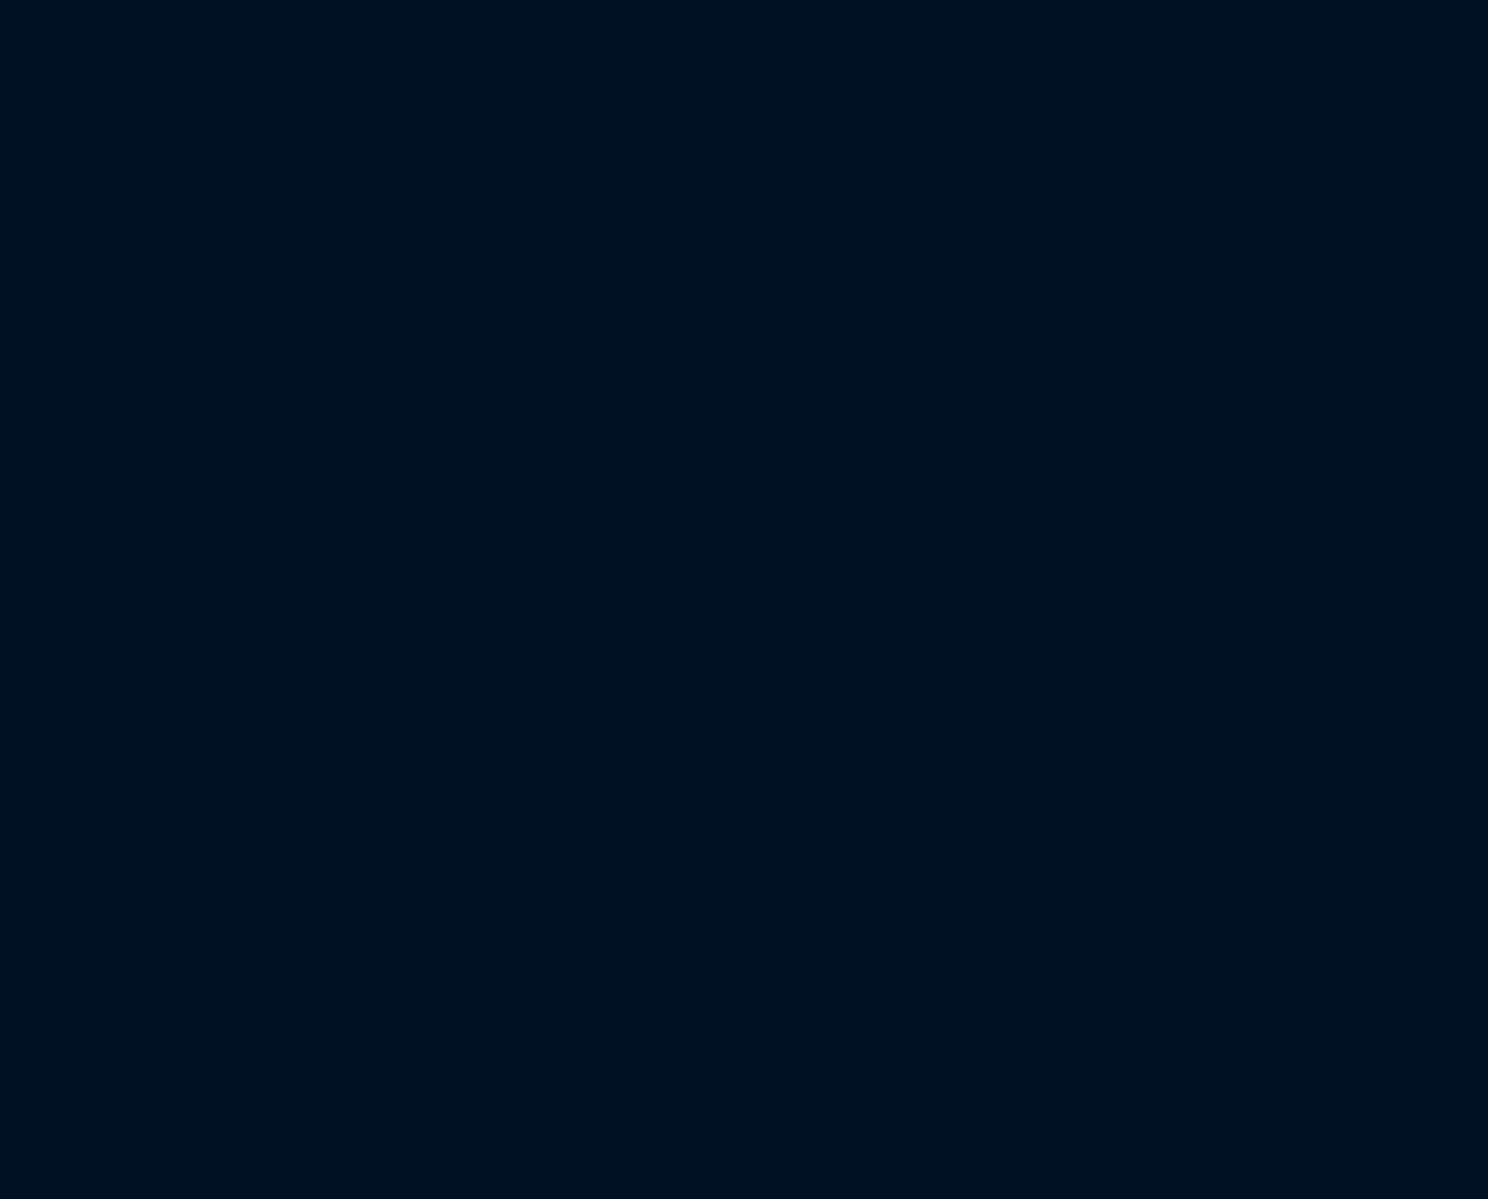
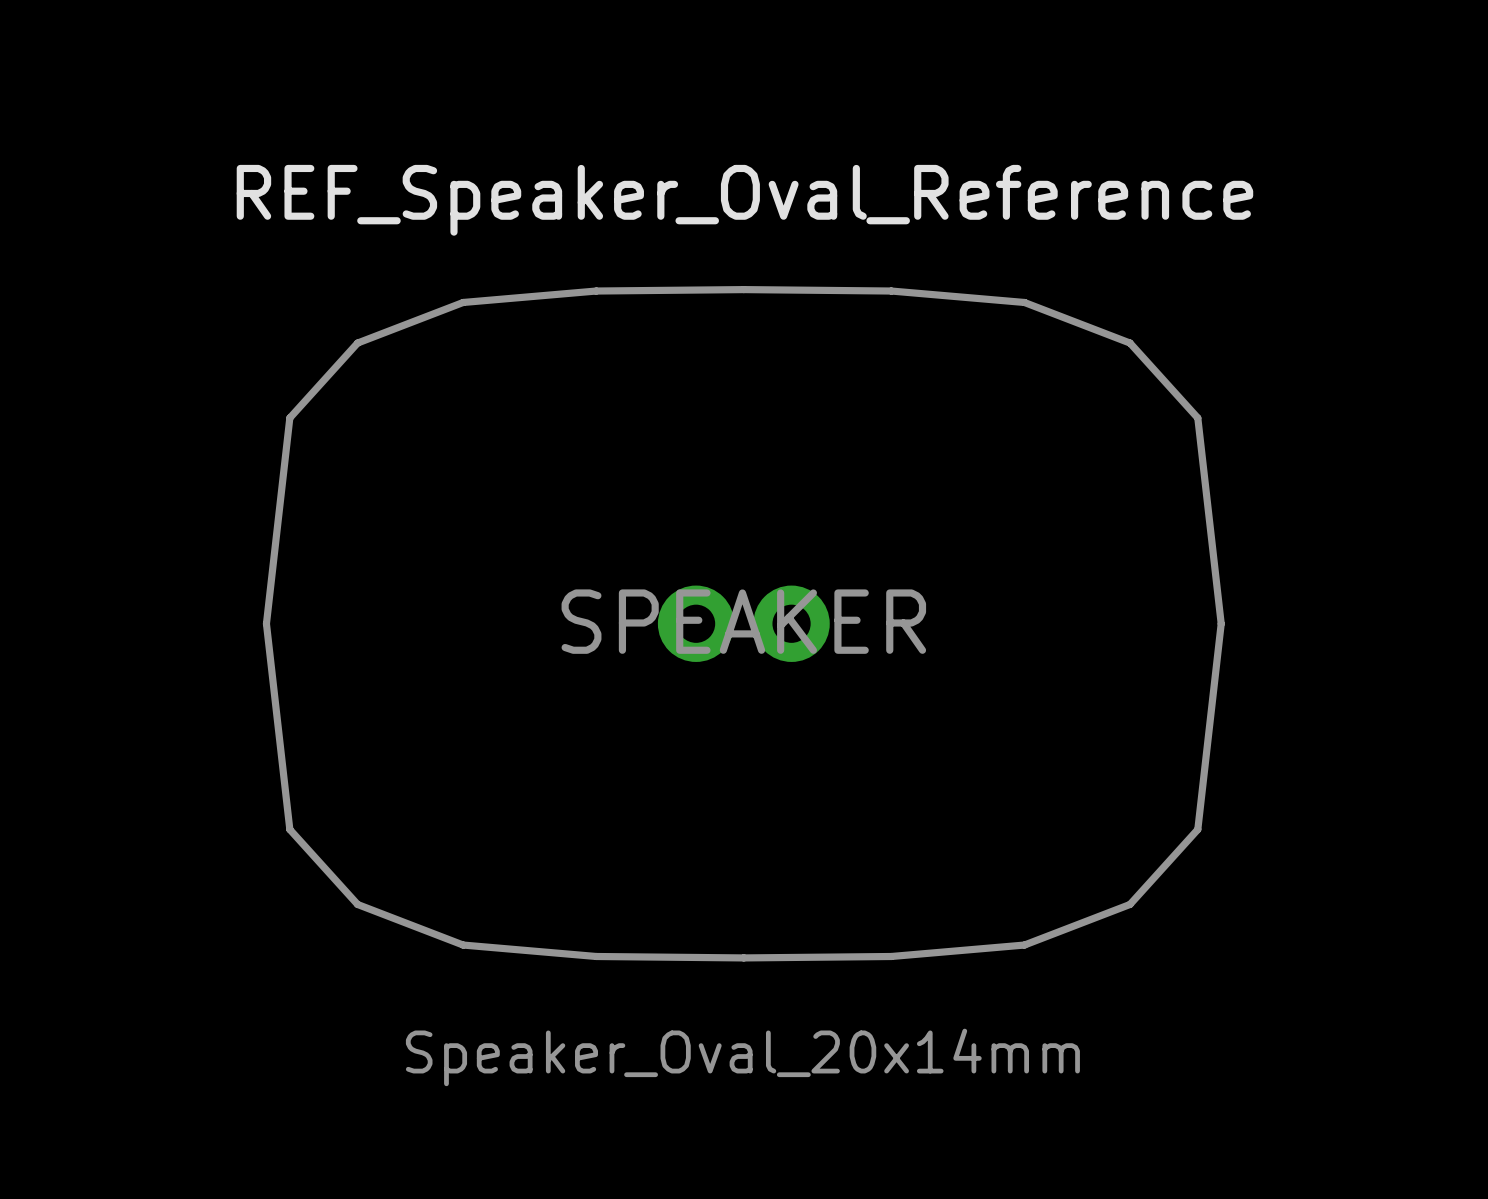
REF_Speaker_Oval_Reference: none -> Speaker_Oval_20x14mm (743, 623)

